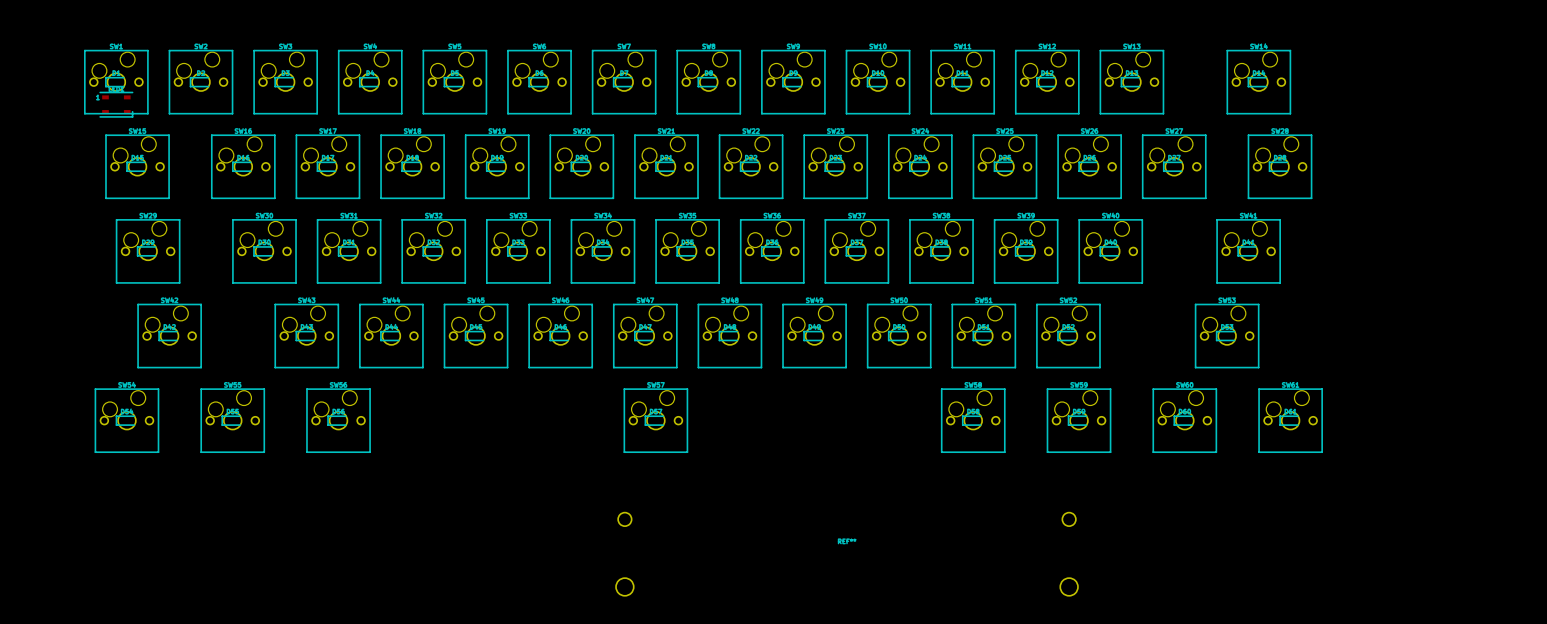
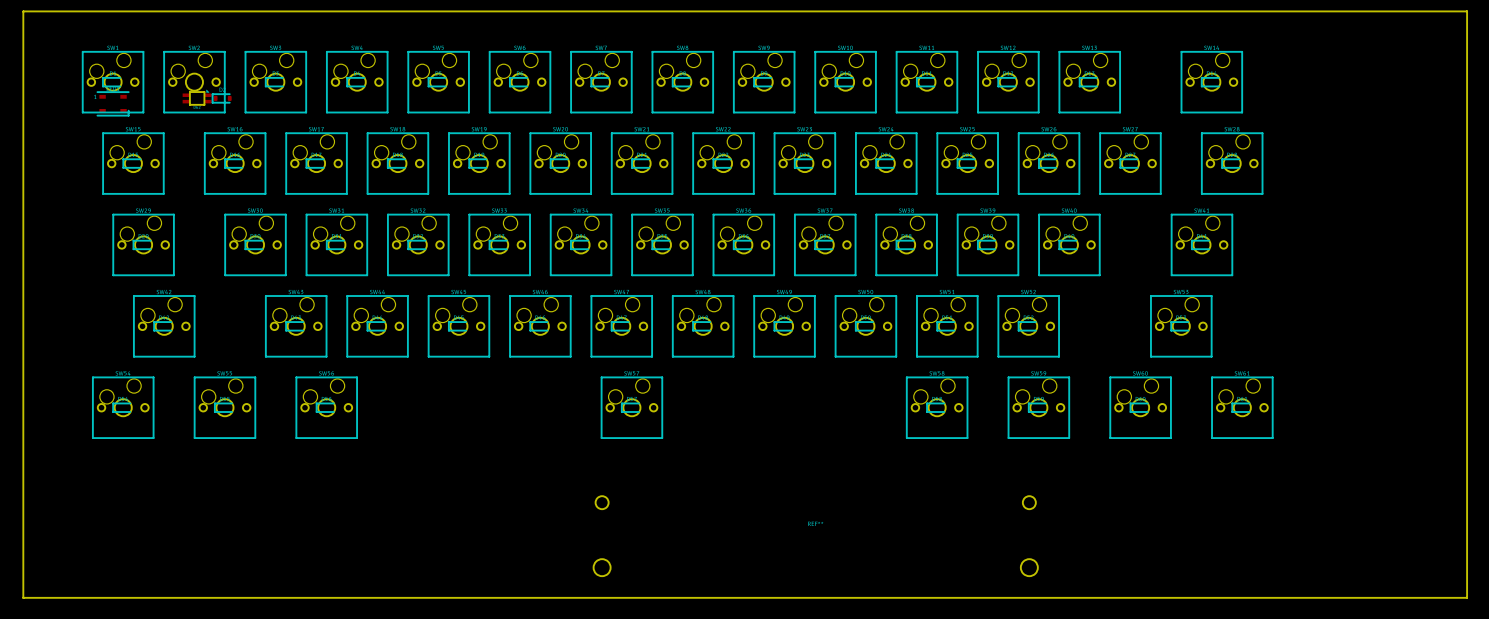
board edge: none -> (23, 11) (23, 597) (1467, 597) (1466, 11) (23, 11)
part position: (200, 82) -> (221, 98)
part: none -> (197, 97)

